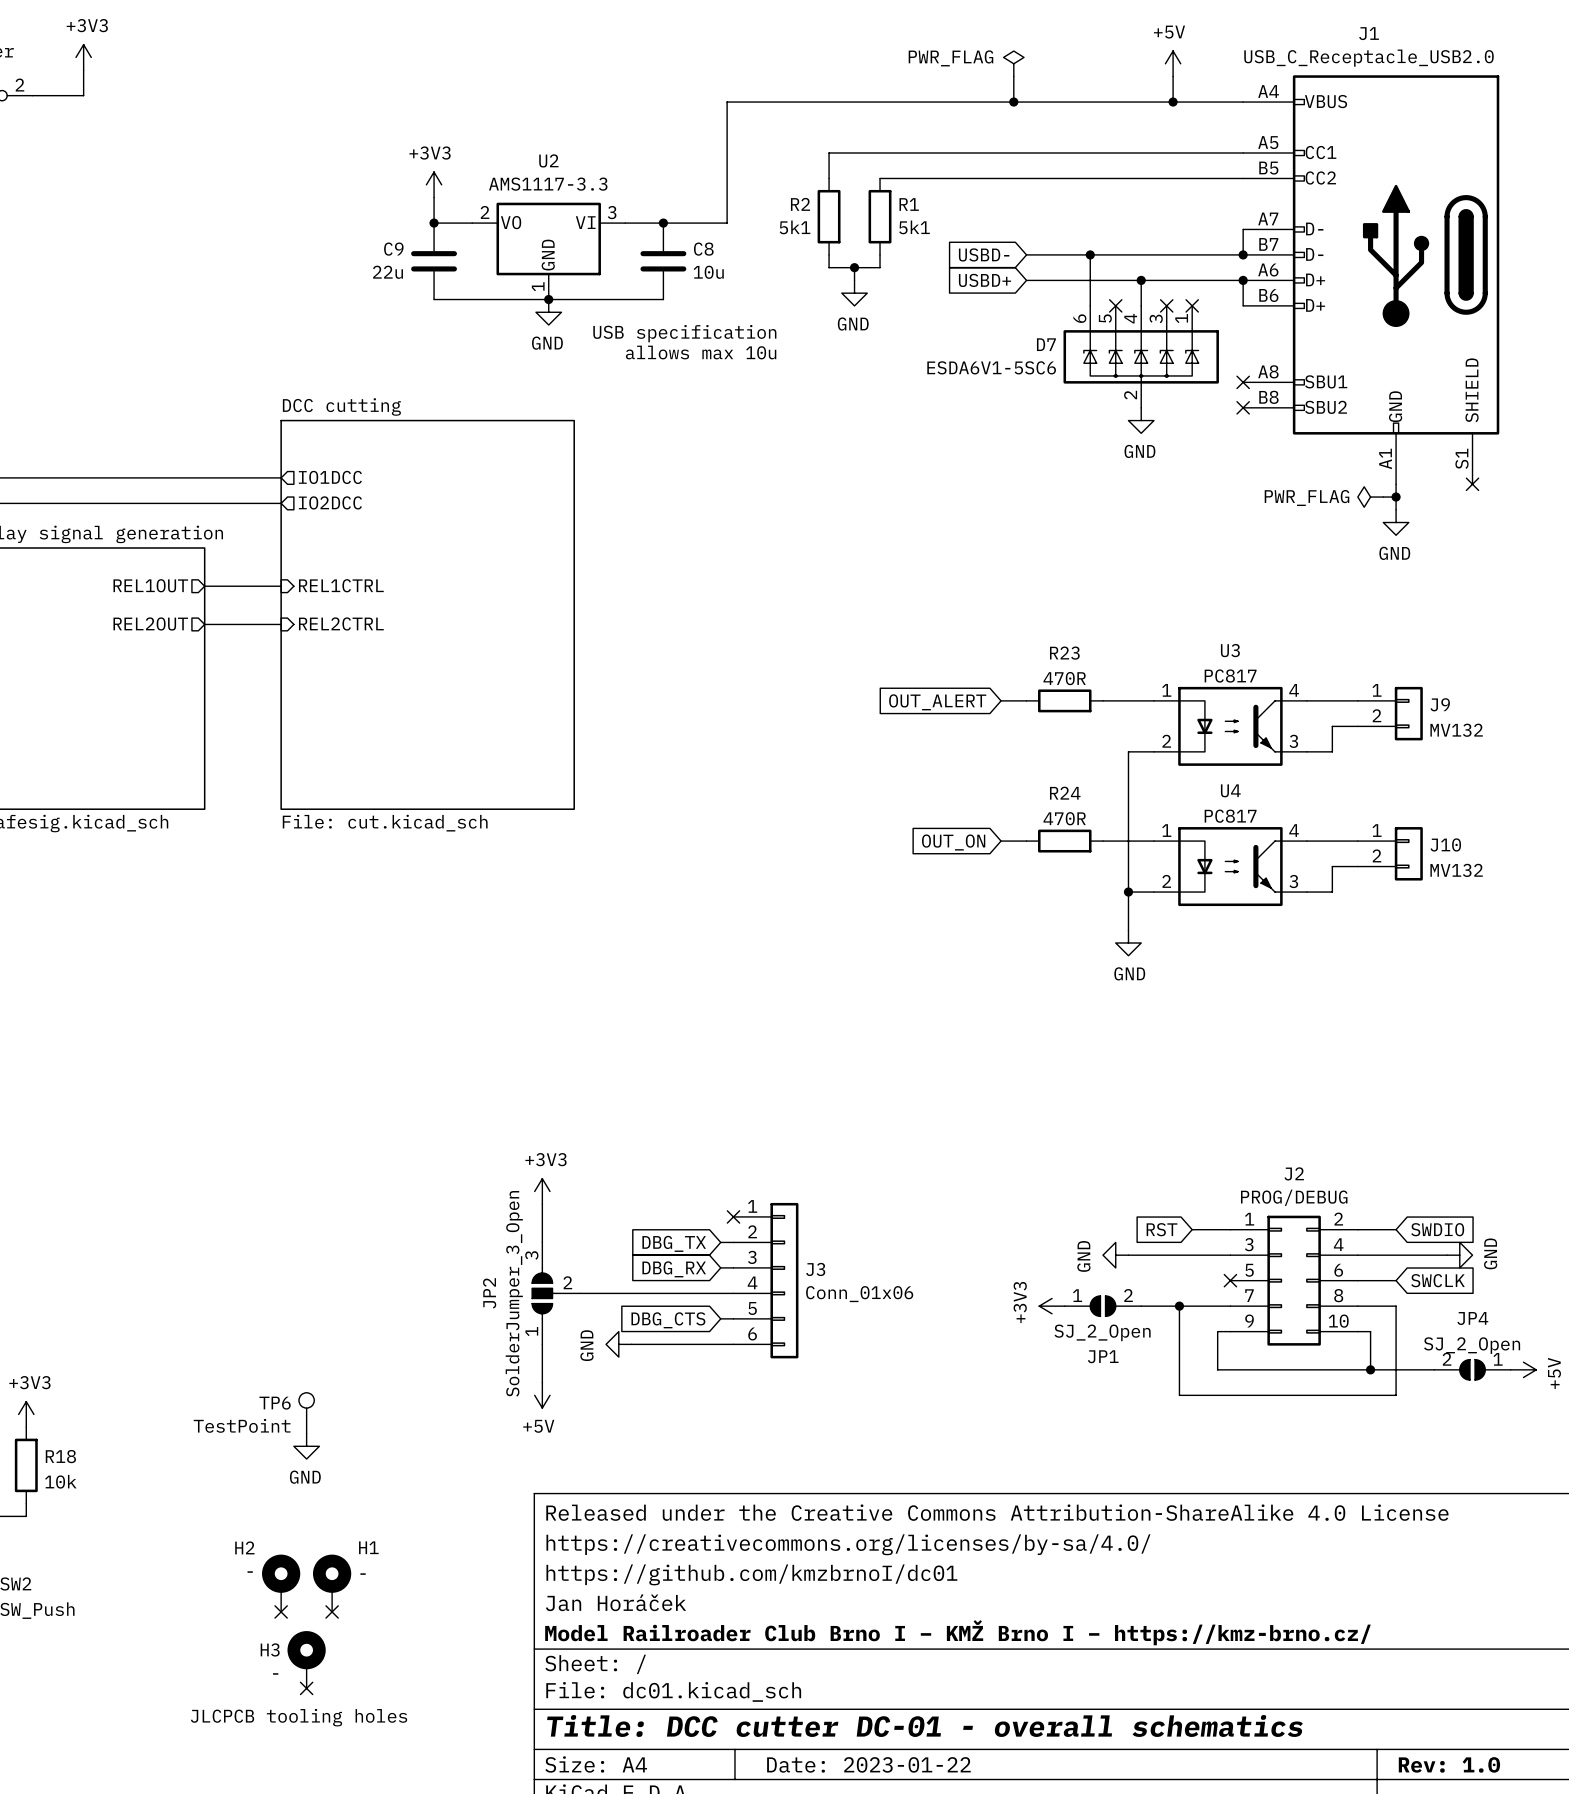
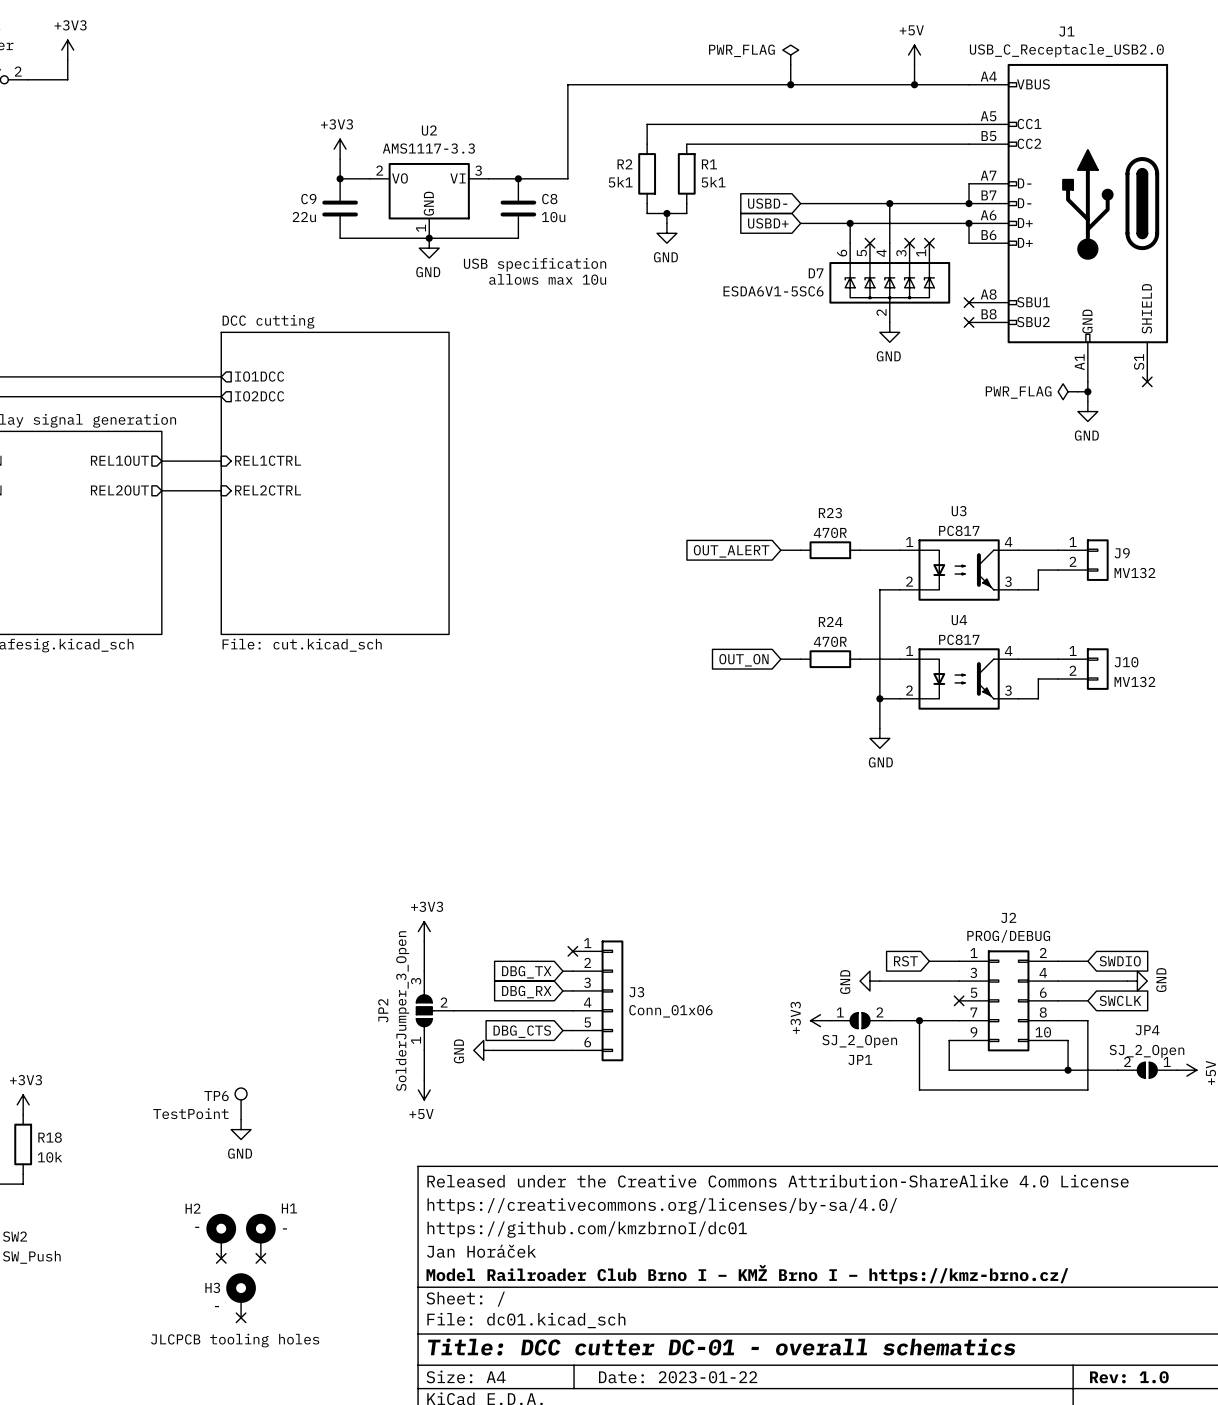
wire: (1090, 254) (1090, 280) -> (889, 203) (889, 223)
junction: (1090, 254) -> none
junction: none -> (889, 203)
junction: none -> (850, 223)
junction: (1141, 280) -> none

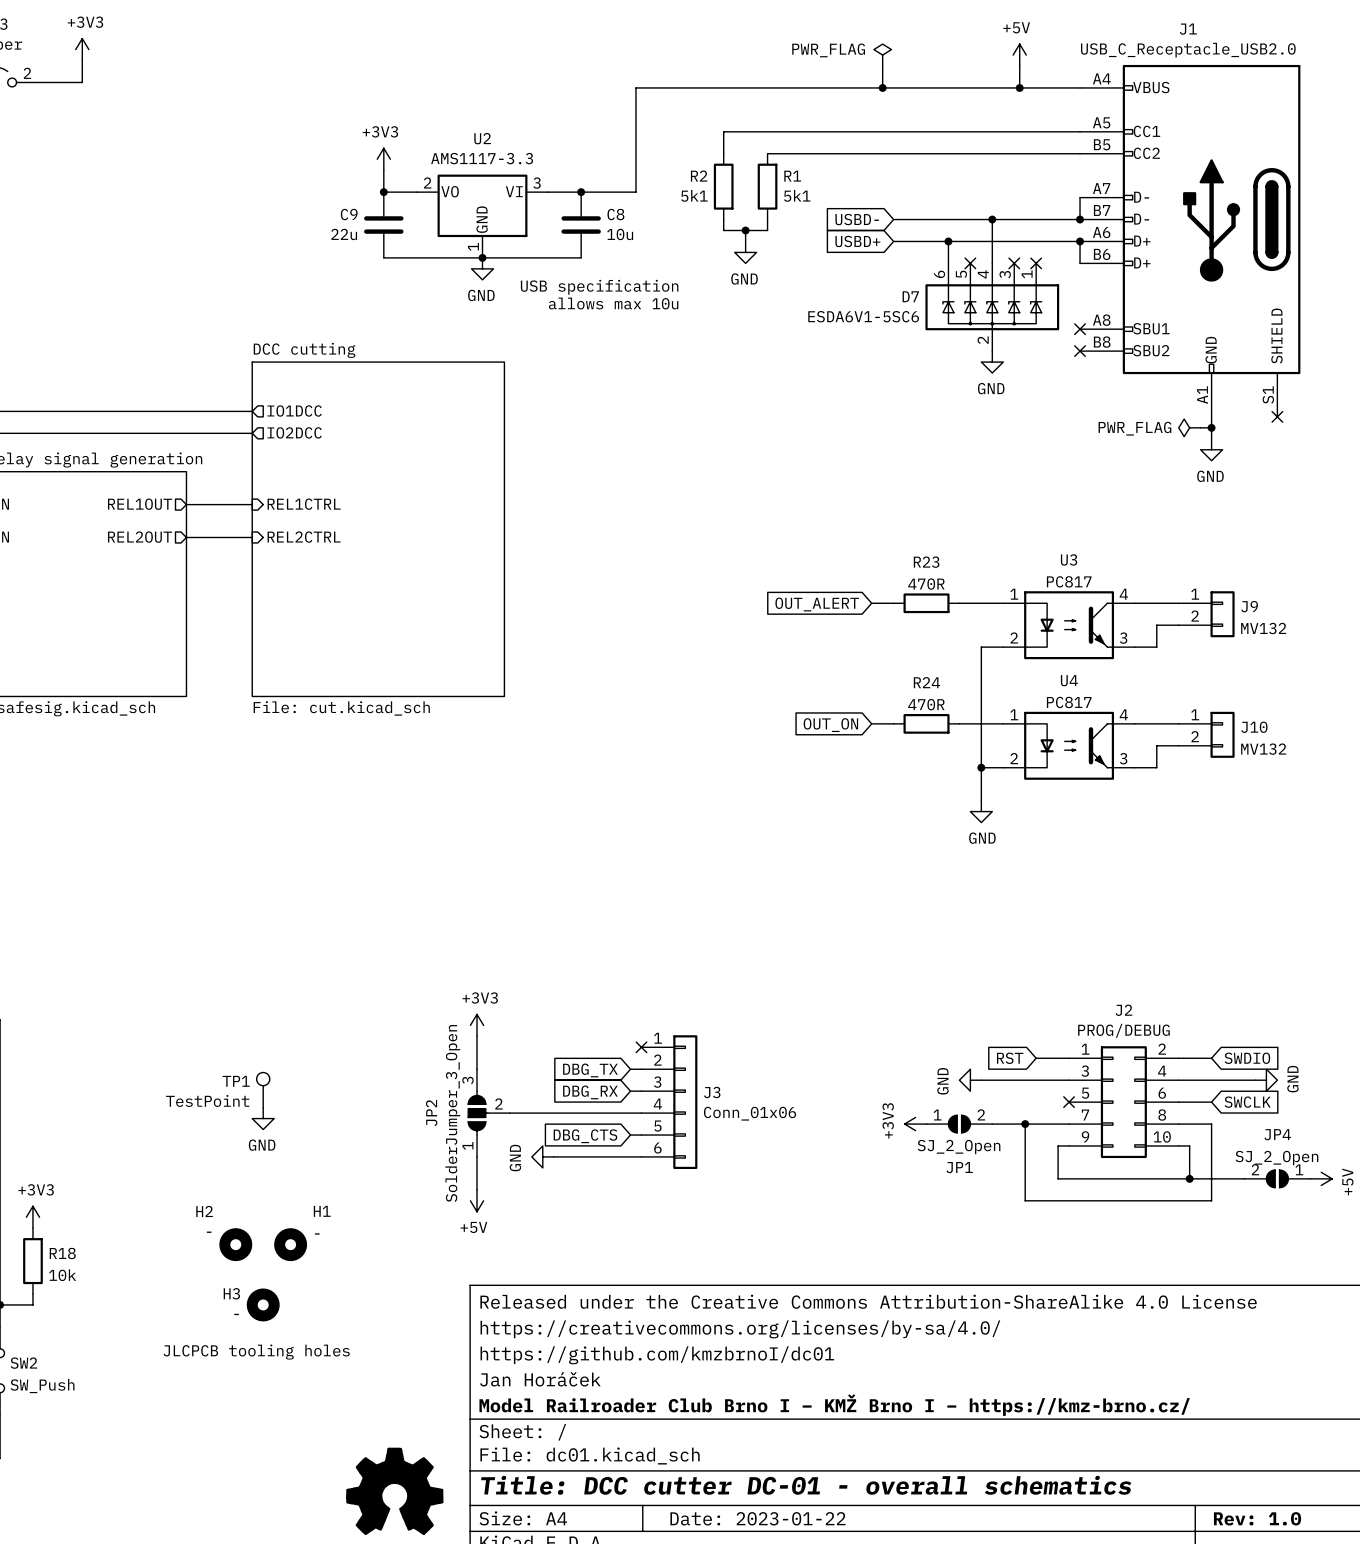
TP1: none -> TestPoint (263, 1090)
TP6: TestPoint (241, 1103) -> none
power symbol position: GND (241, 1129) -> GND (263, 1118)
H2 symbol: [206, 1213, 237, 1259] -> [219, 1228, 253, 1262]
H1 symbol: [246, 1213, 276, 1259] -> [274, 1228, 308, 1262]
no-connect mark: (221, 1258) -> none
no-connect mark: (260, 1258) -> none
H3 symbol: [226, 1273, 256, 1318] -> [246, 1288, 280, 1322]
no-connect mark: (241, 1317) -> none
text position: JLCPCB tooling holes (235, 1340) -> JLCPCB tooling holes (256, 1352)
power symbol: none -> (394, 1491)

